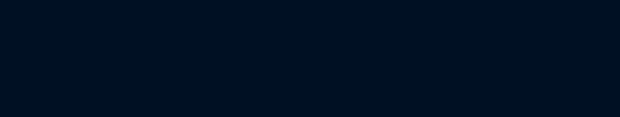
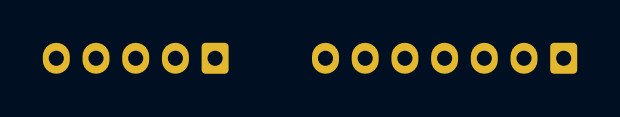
part: none -> (135, 58)
part: none -> (444, 58)

